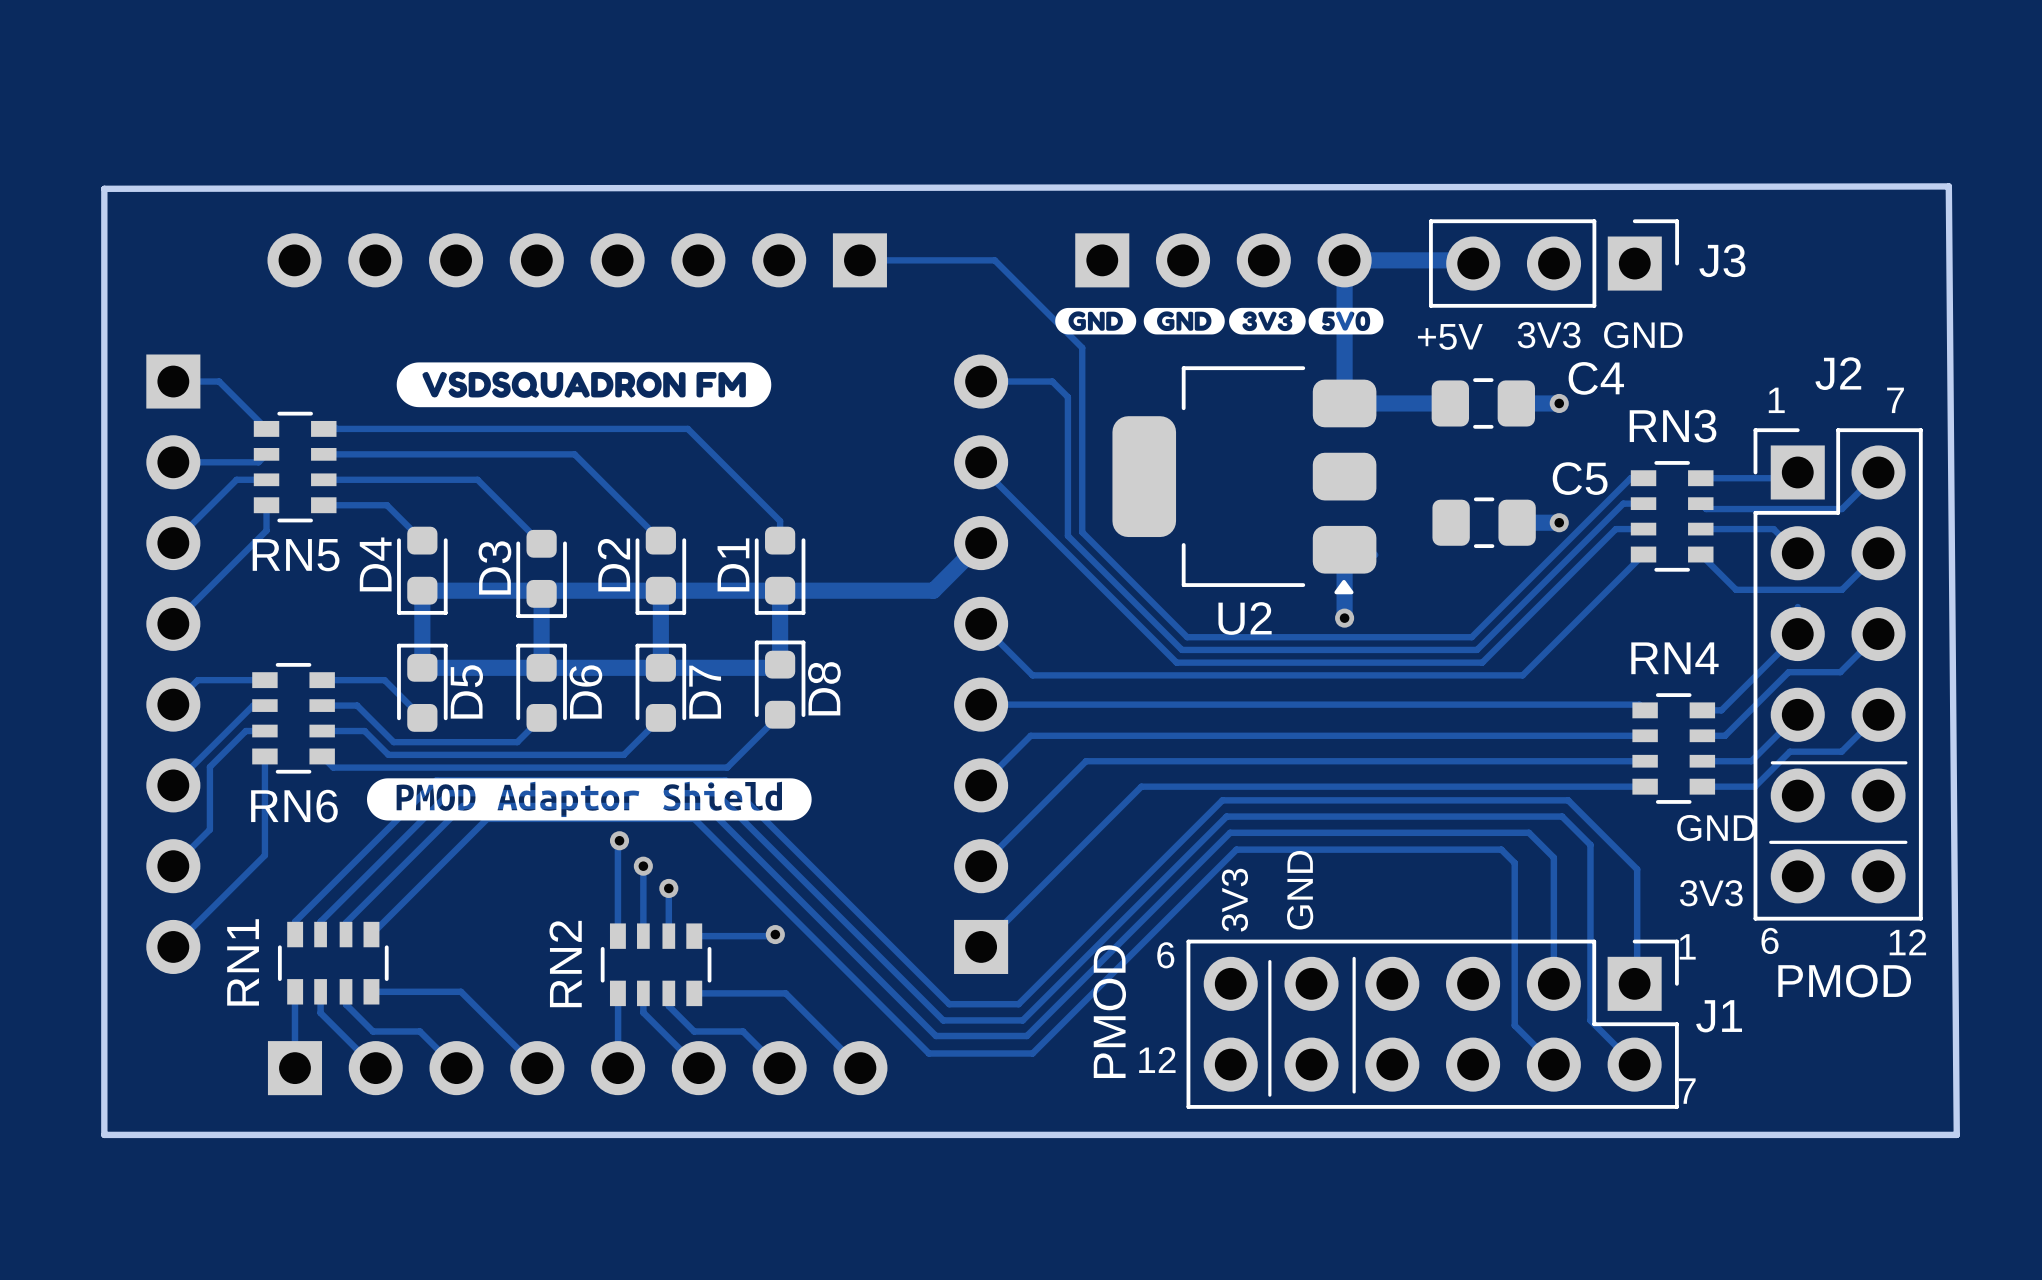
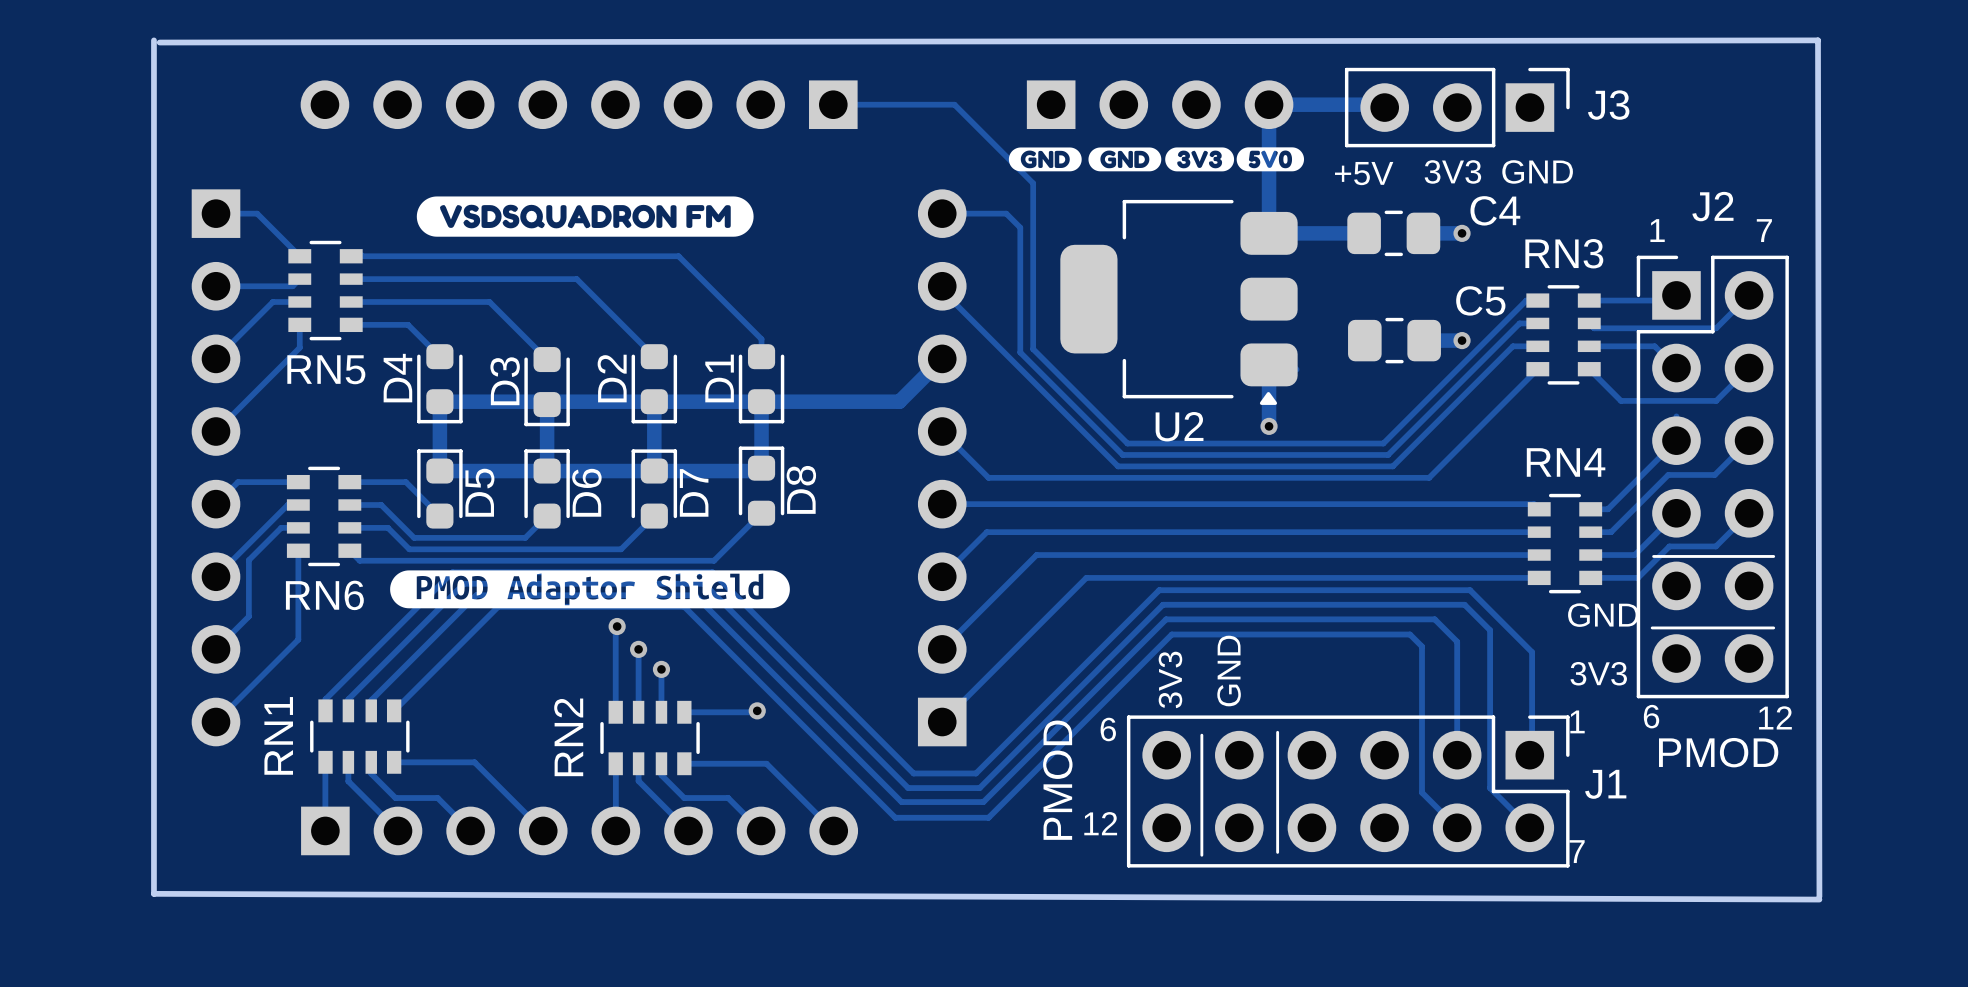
board edge: (104, 188) (1948, 186) (1956, 1134) (104, 1134) -> (1819, 899) (153, 893) (153, 890)
board edge: none -> (159, 42) (1818, 40) (1819, 896)

